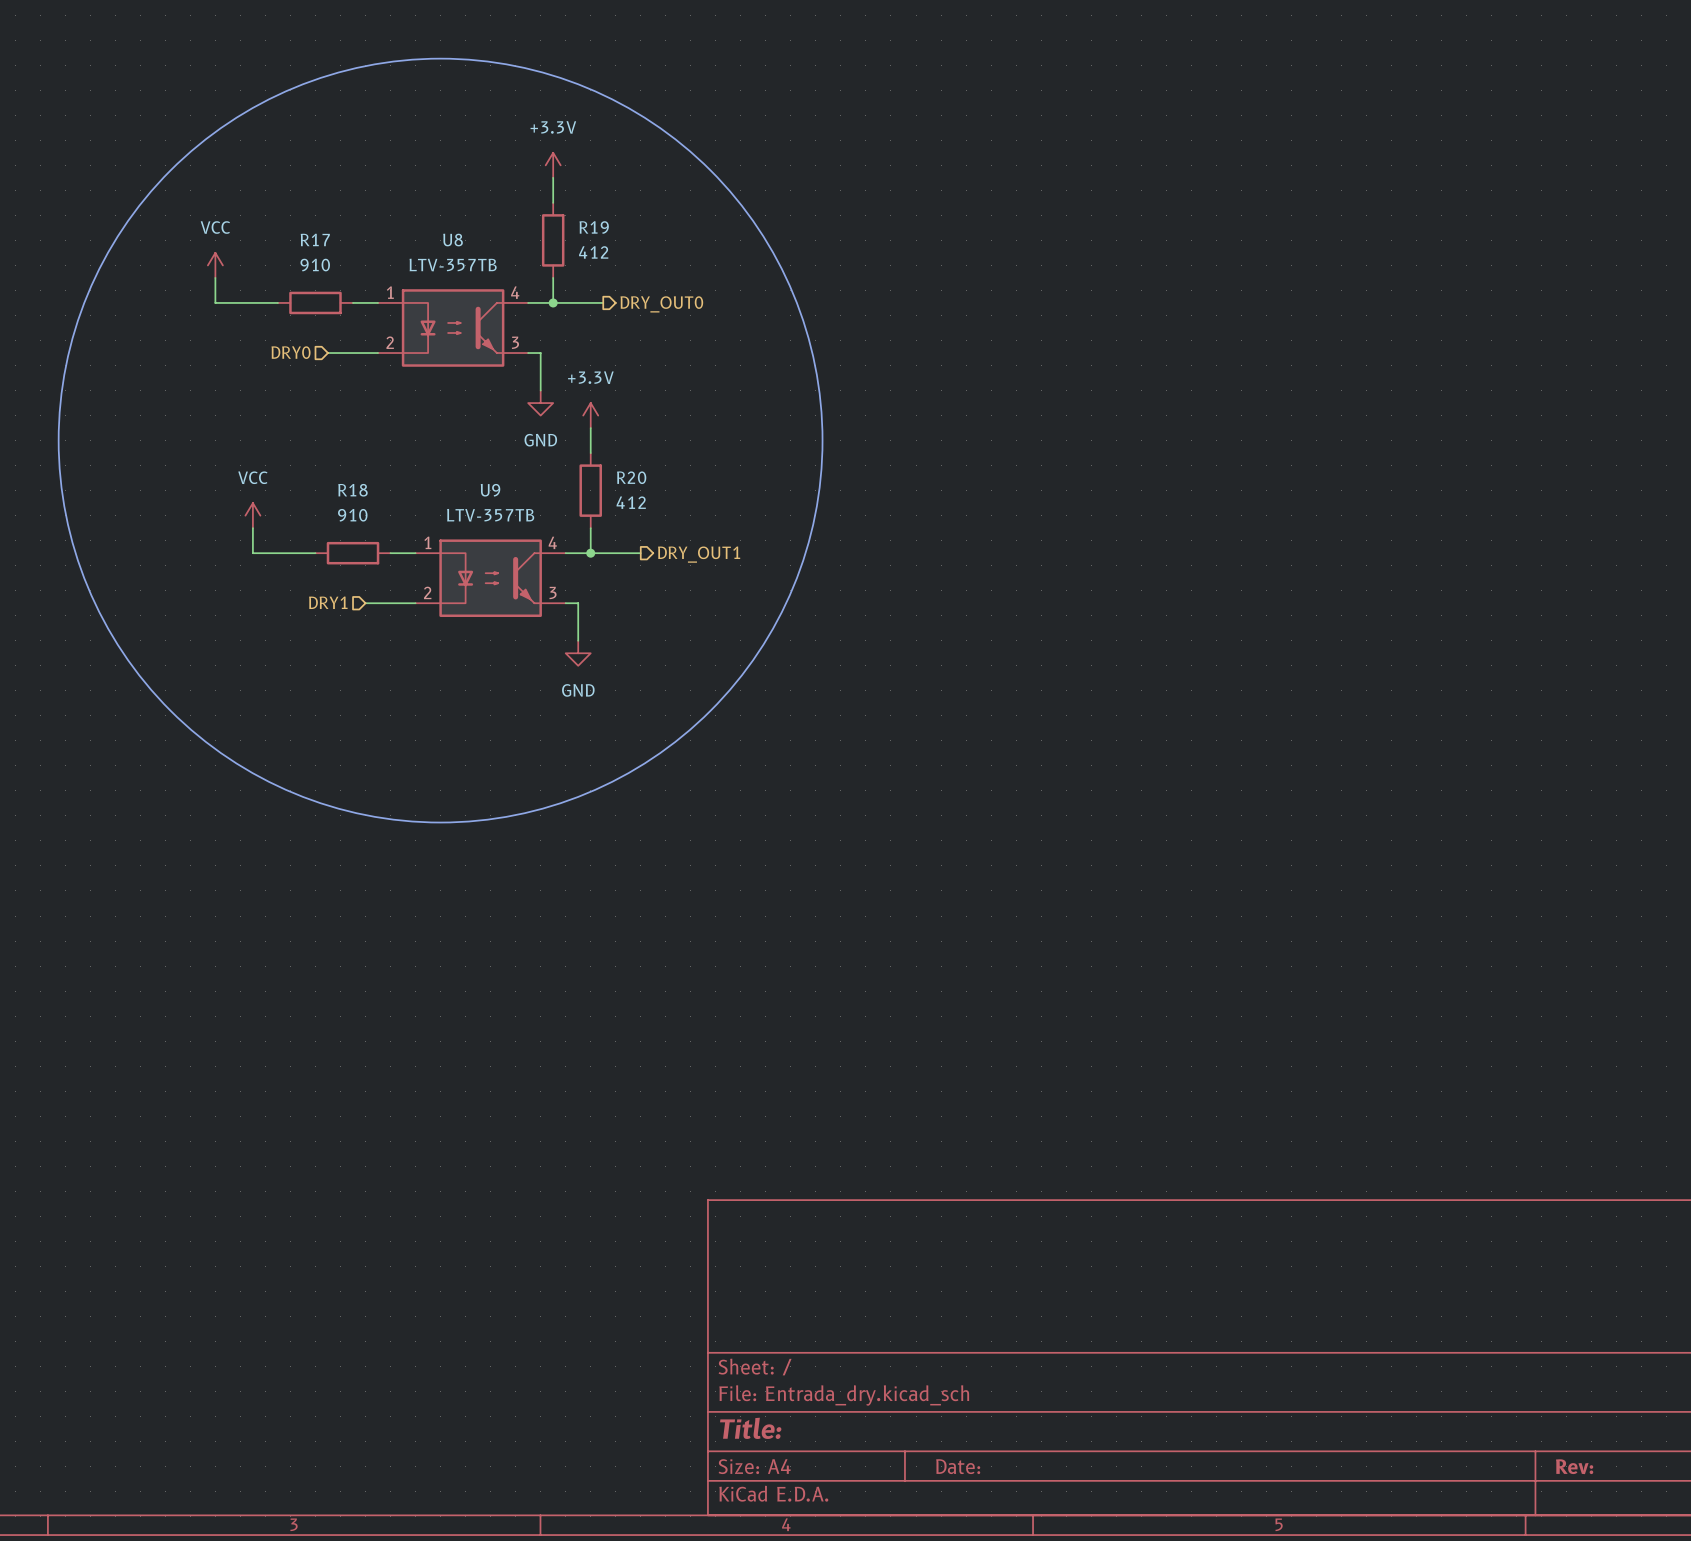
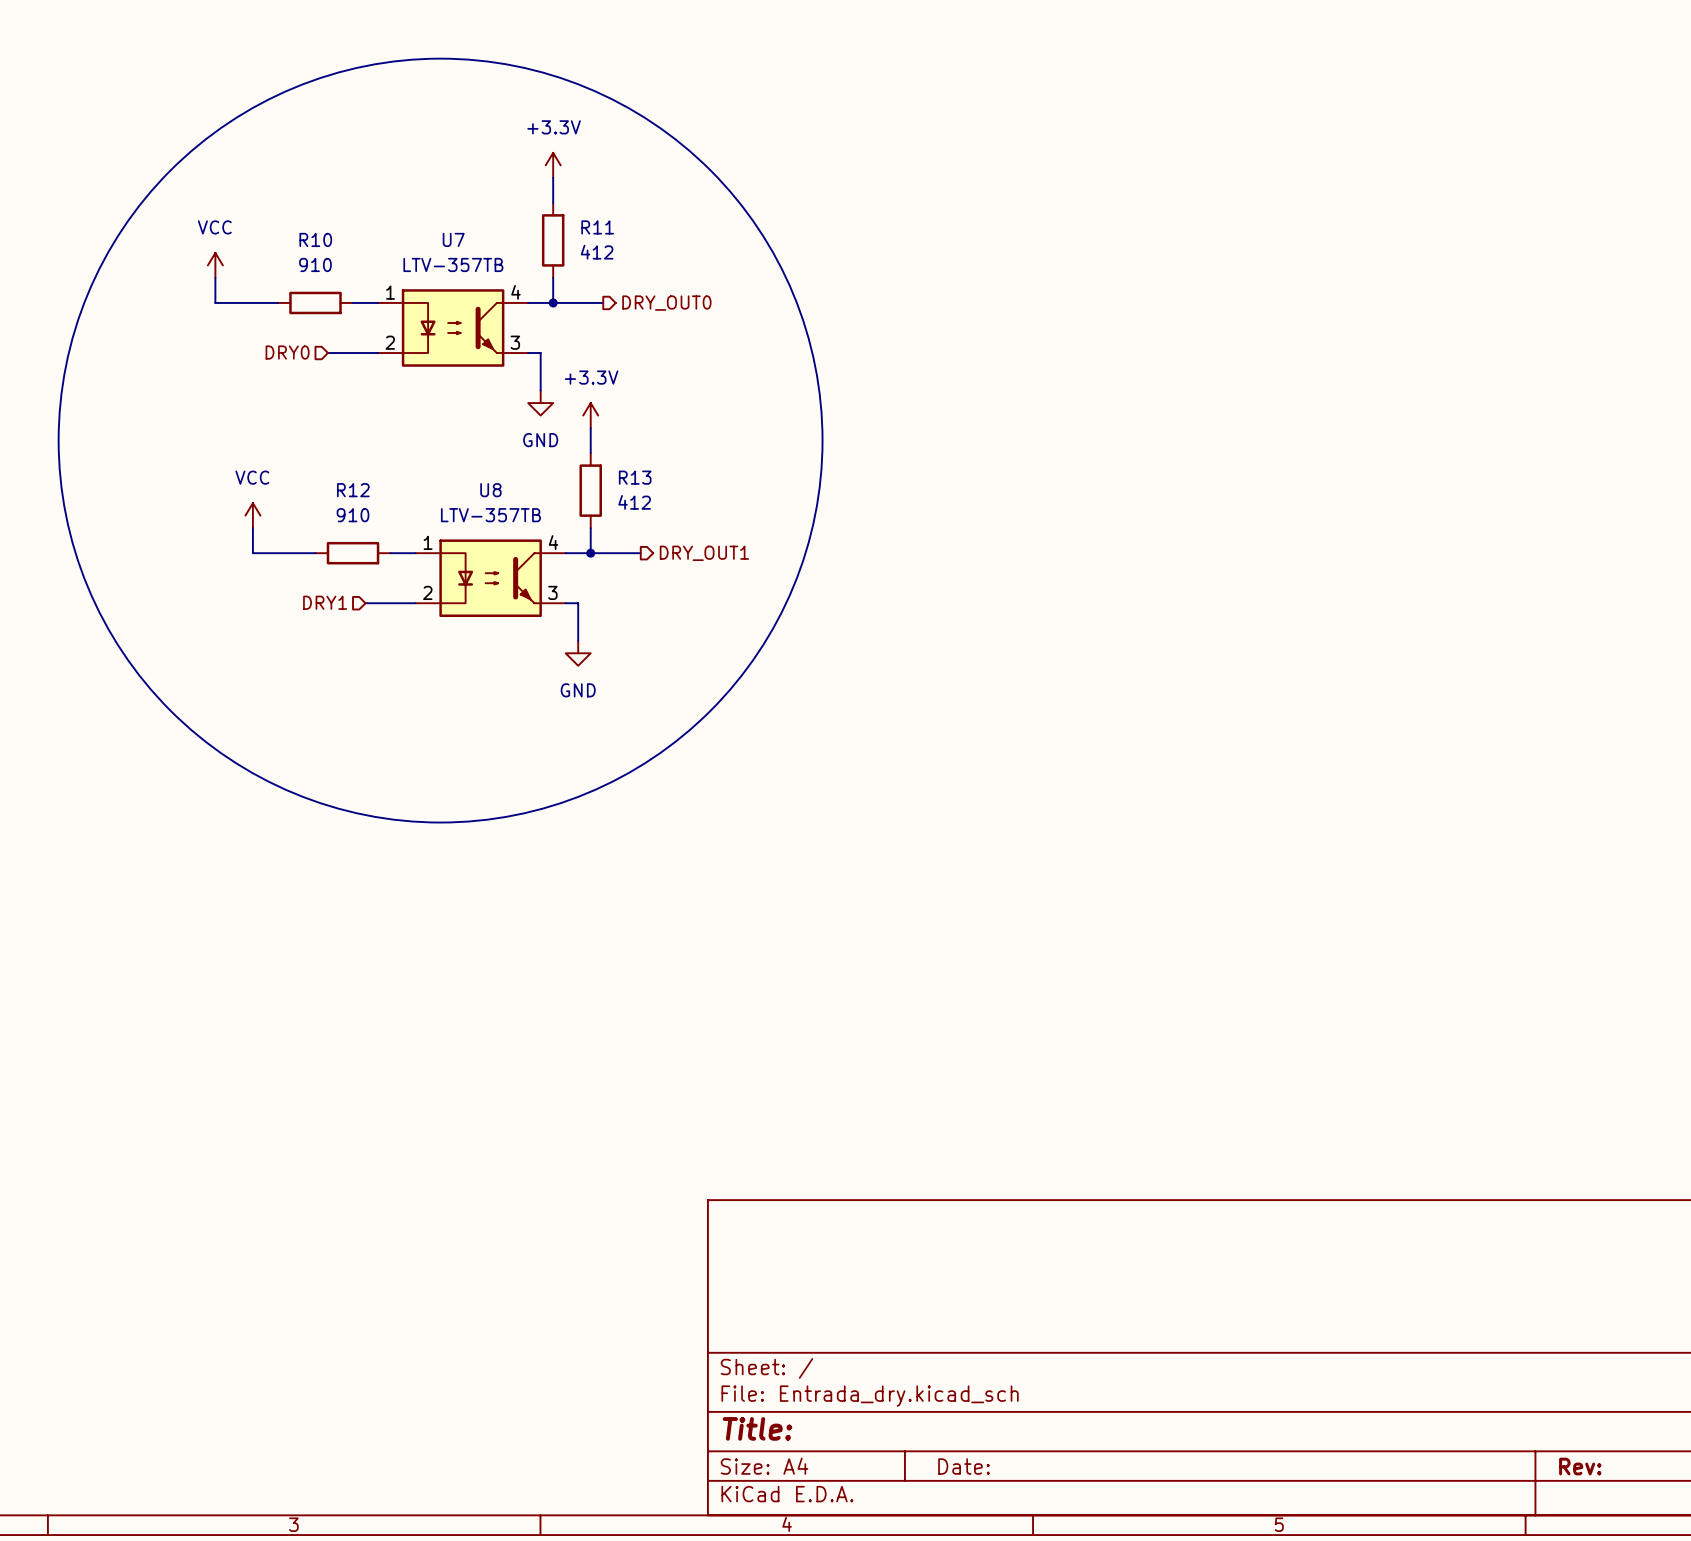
R19 name: R19 (594, 227) -> R11 (597, 227)
R17 name: R17 (315, 239) -> R10 (315, 239)
U8 name: U8 (453, 240) -> U7 (453, 239)
R20 name: R20 (631, 477) -> R13 (635, 477)
R18 name: R18 (352, 490) -> R12 (353, 490)
U9 name: U9 (490, 490) -> U8 (490, 490)

